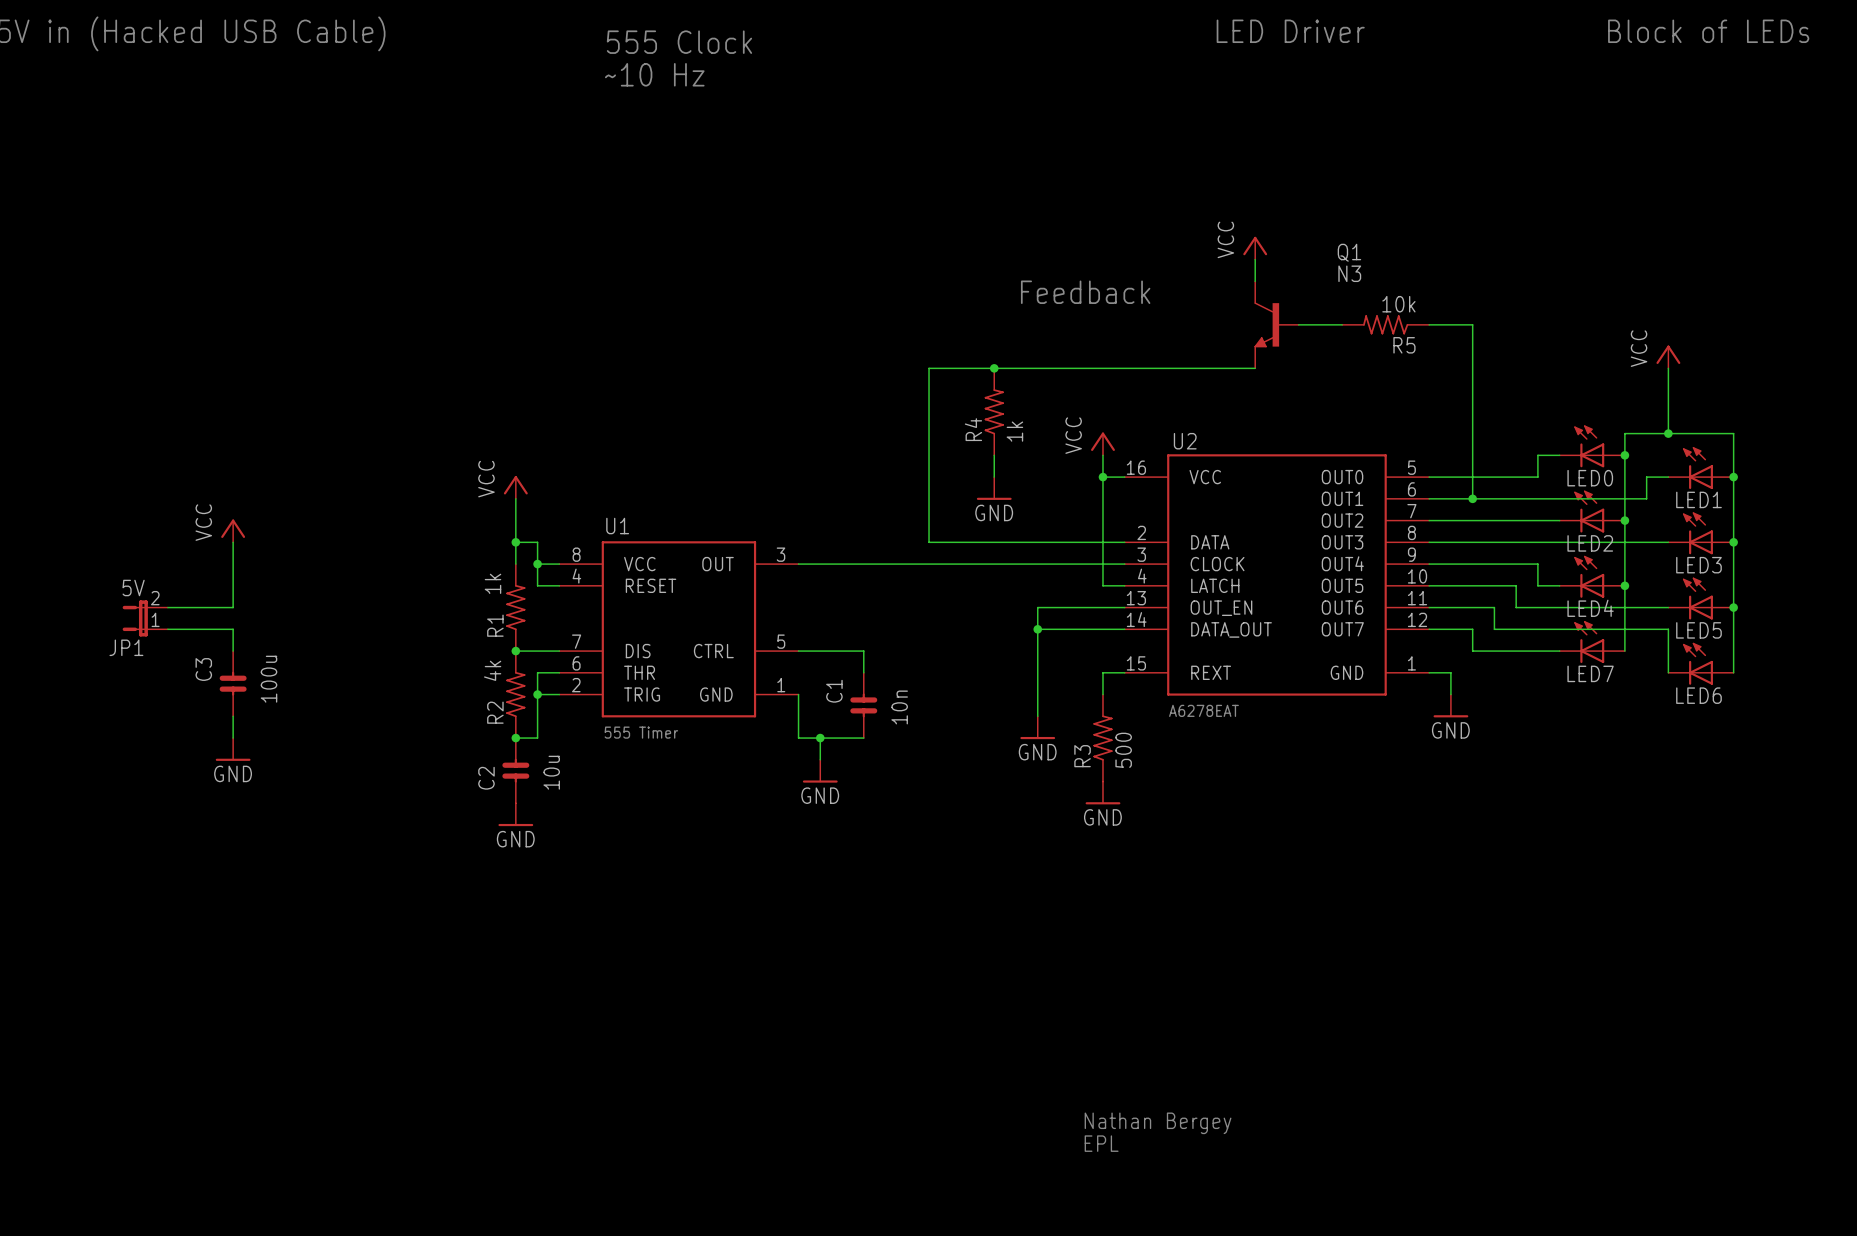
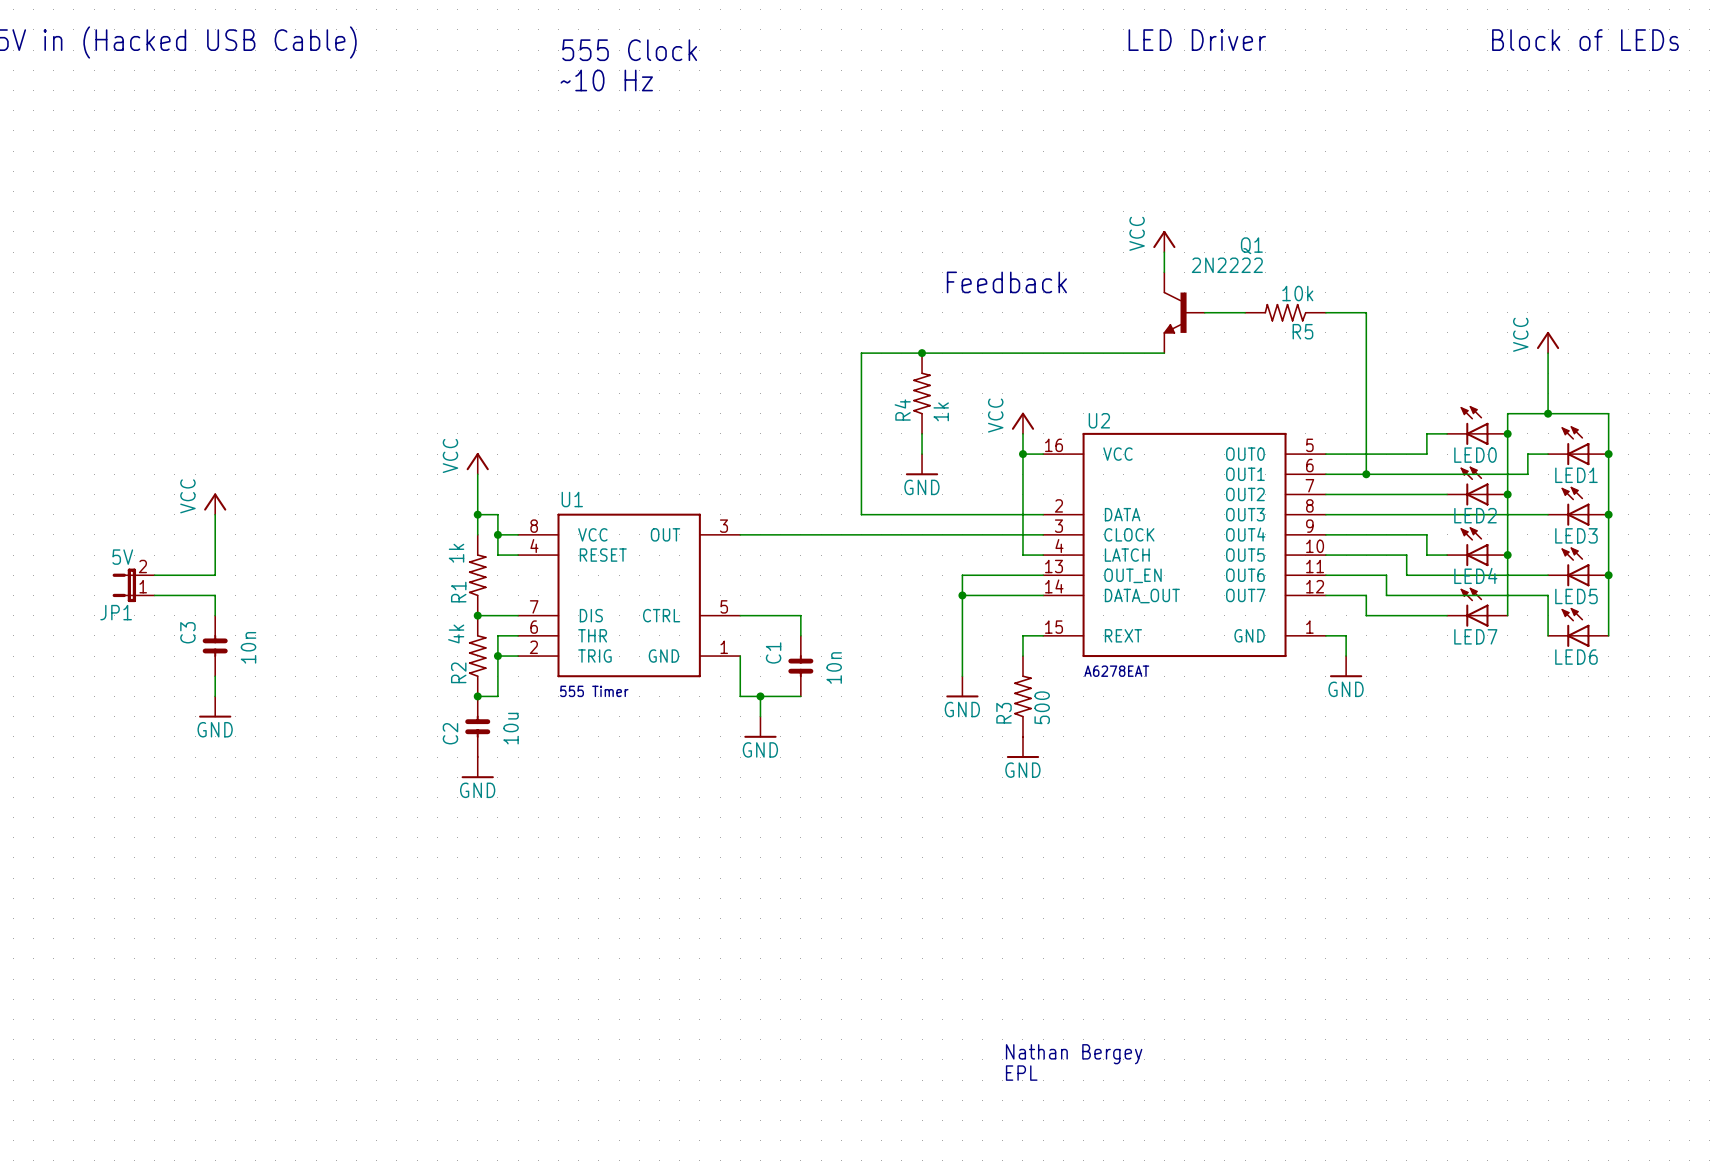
Q1 value: N3 (1349, 273) -> 2N2222 (1227, 265)
C3 value: 100u (269, 679) -> 10n (248, 647)

